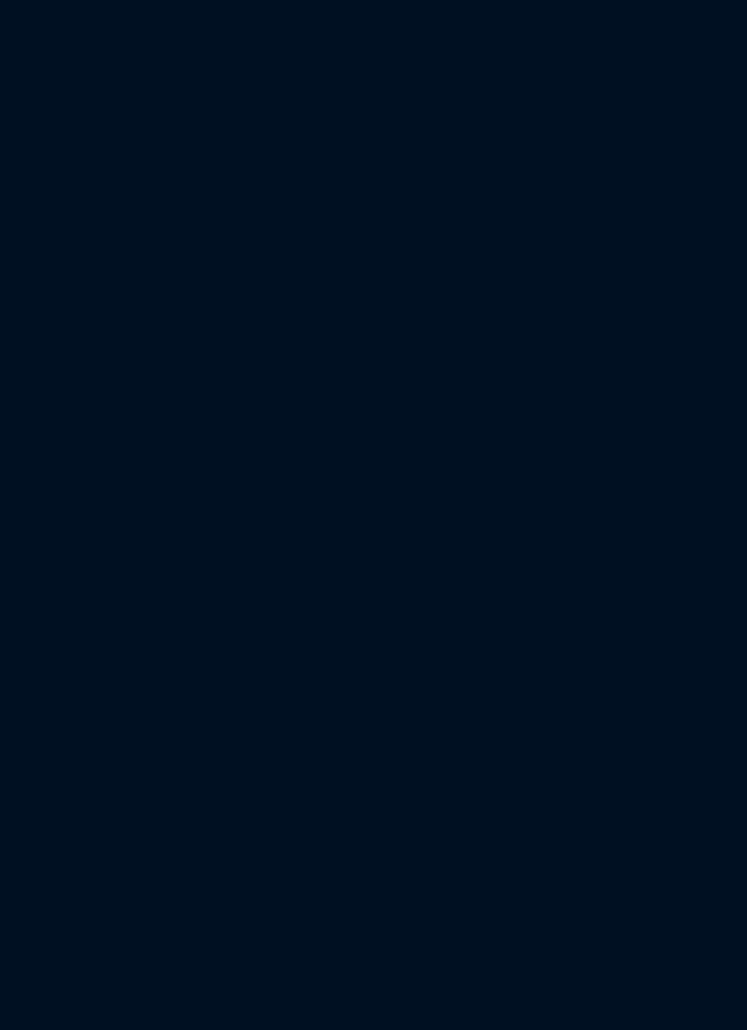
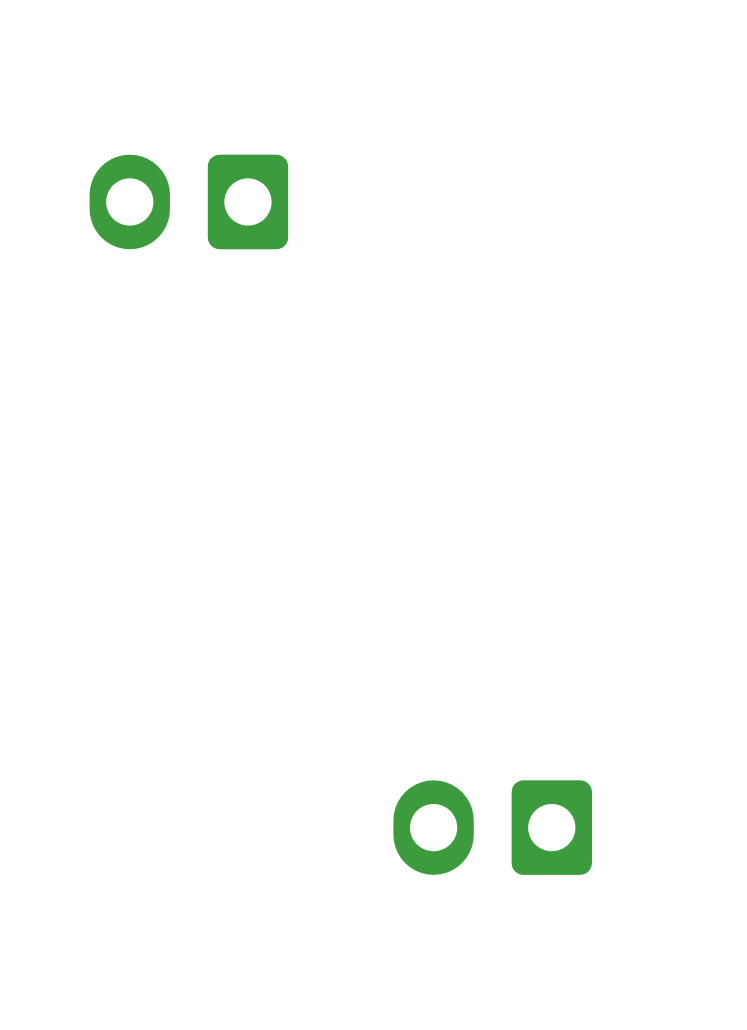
part: none -> (188, 201)
part: none -> (492, 827)

